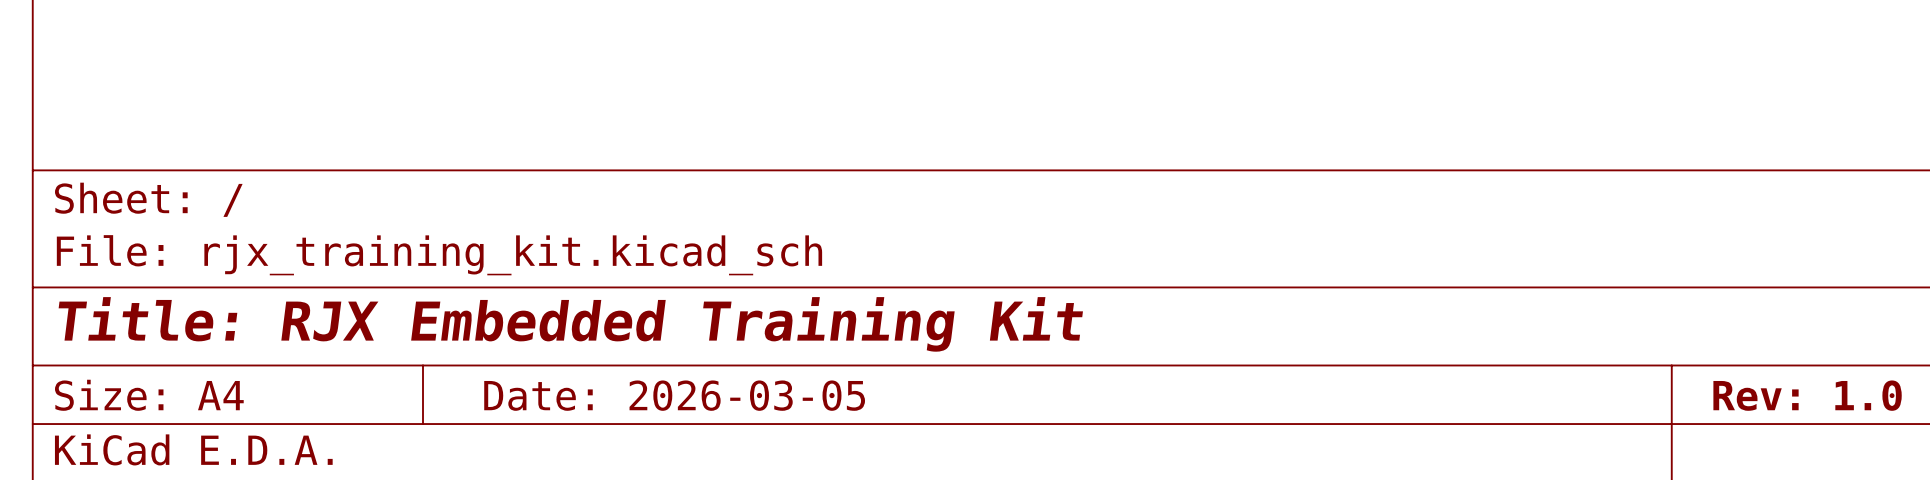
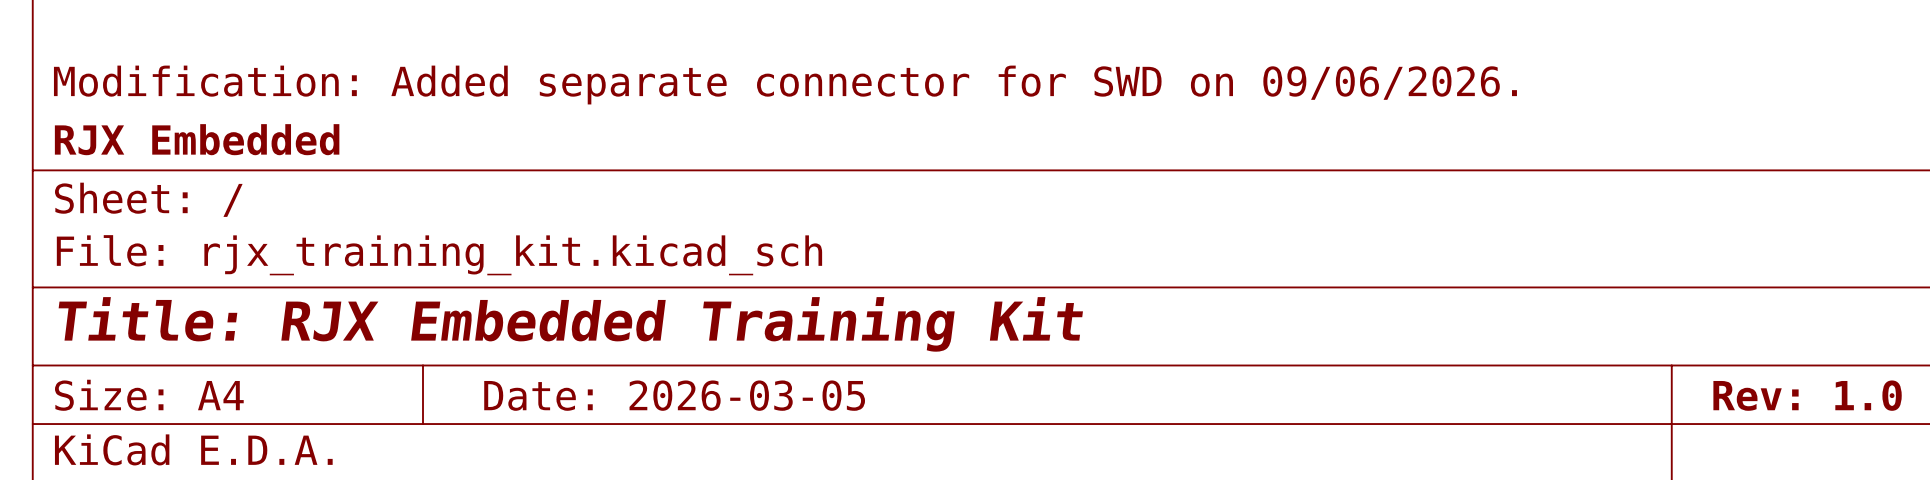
title block: none -> Modification: Added separate connector for SWD on 09/06/2026. (785, 85)
title block: none -> RJX Embedded (197, 139)

